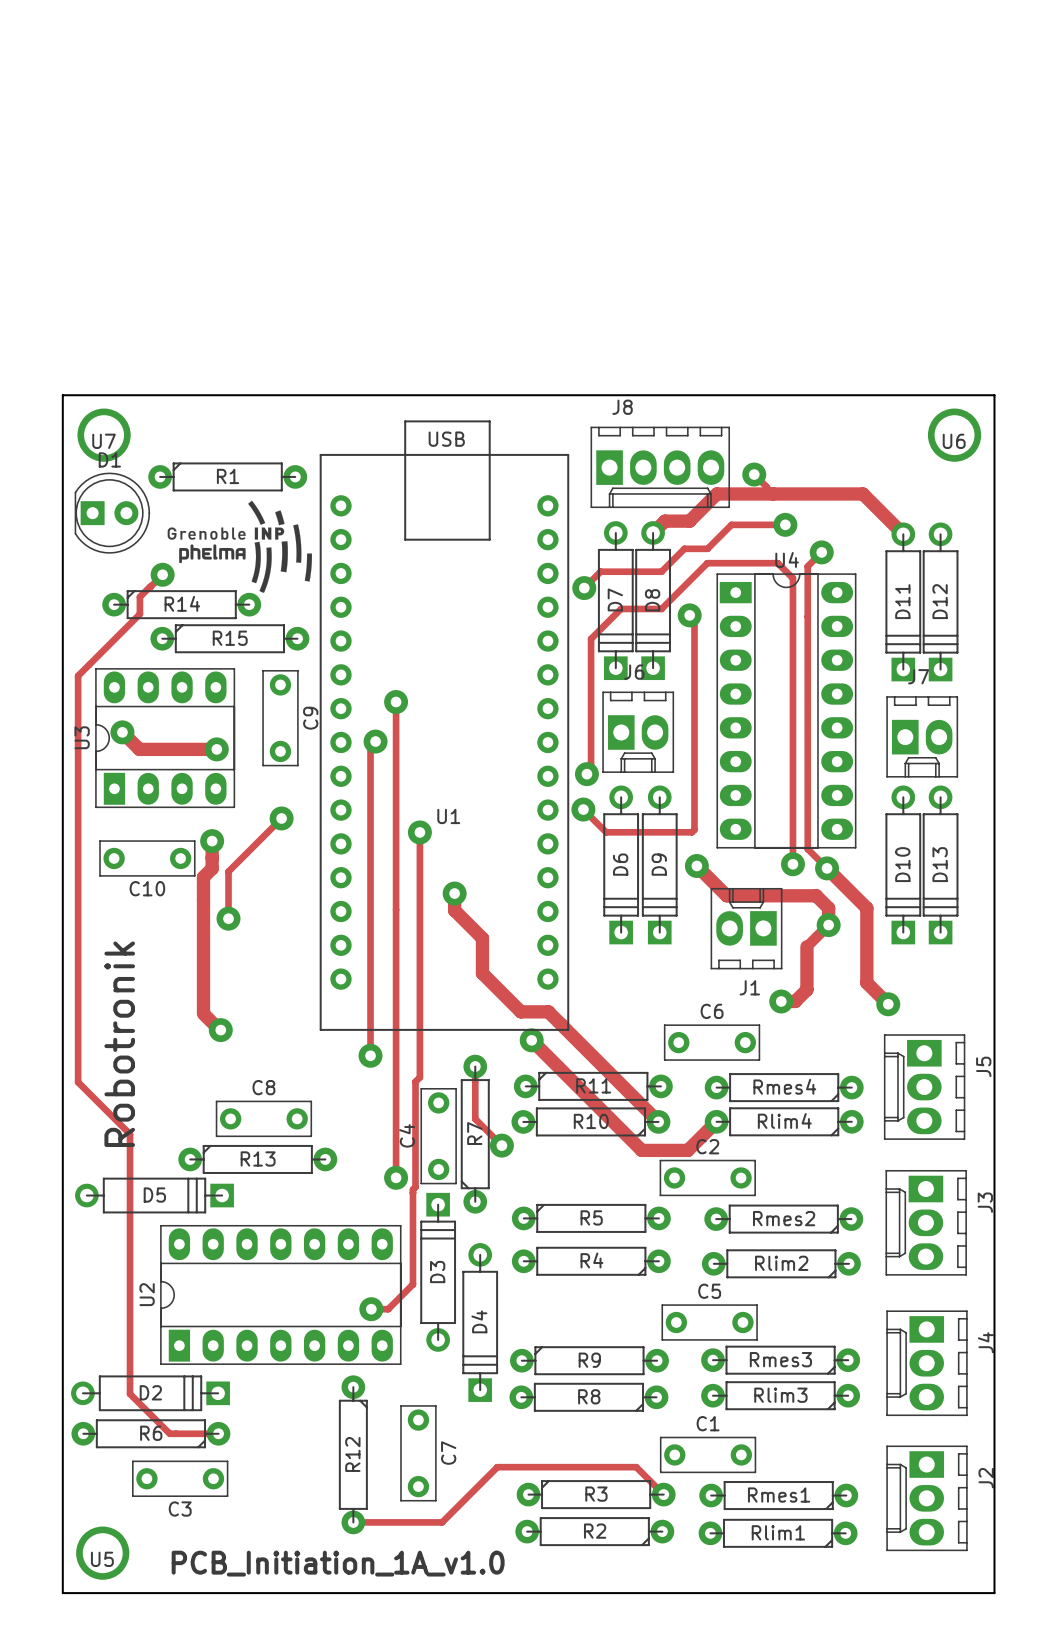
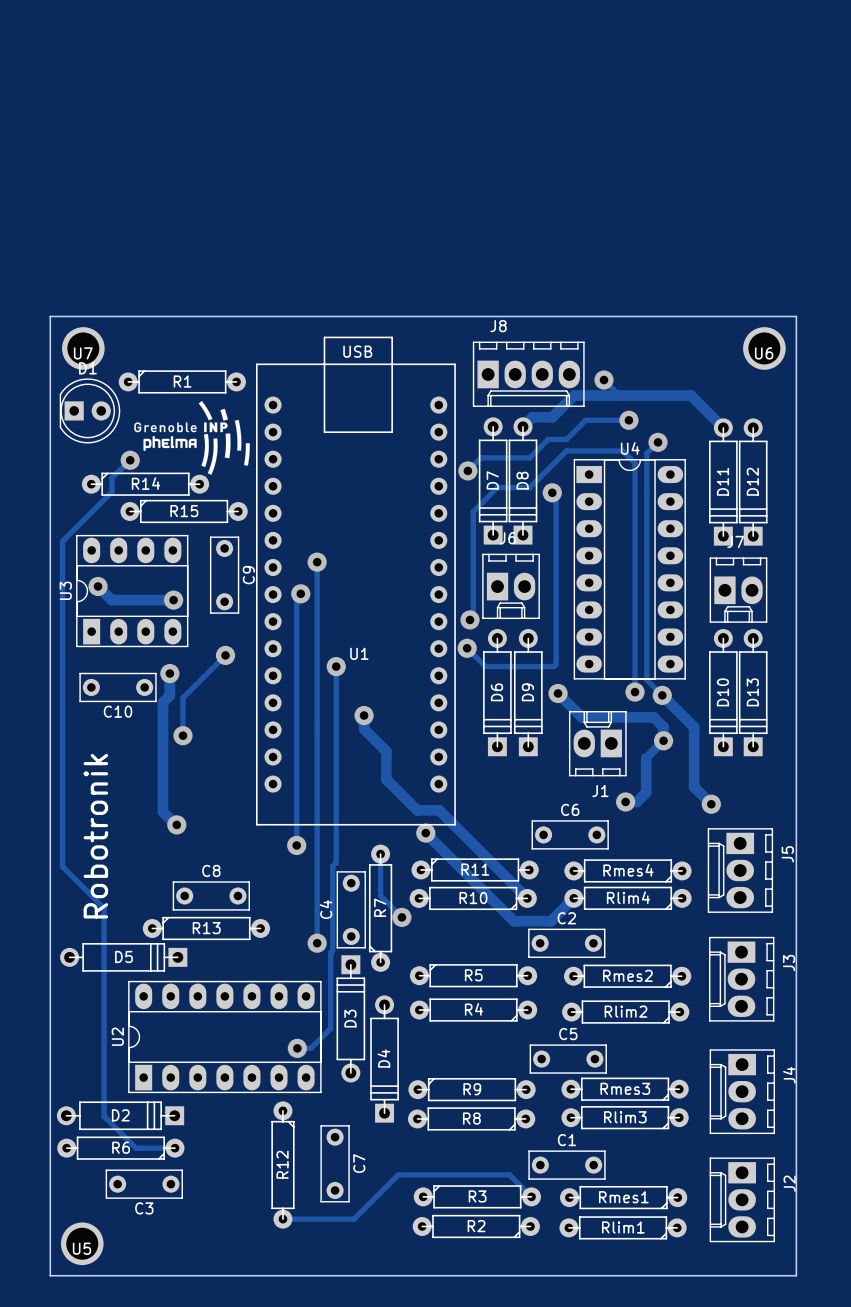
text: PCB_Initiation_1A_v1.0 (338, 1563) -> none

